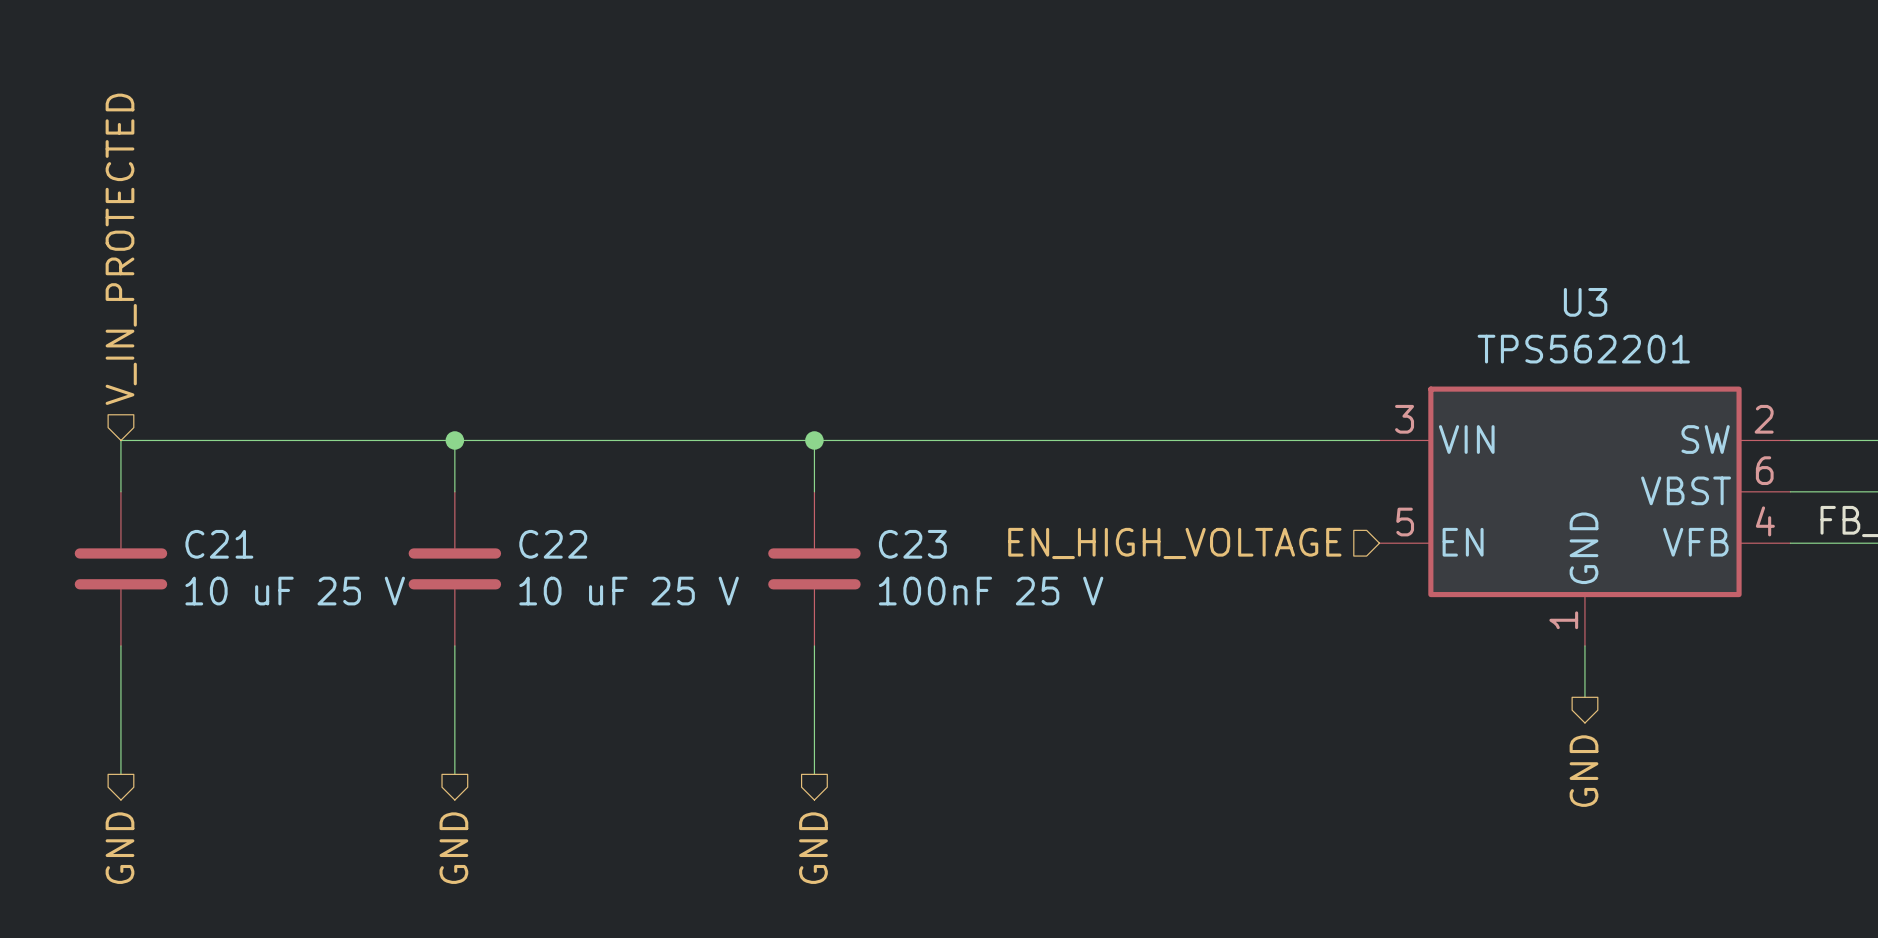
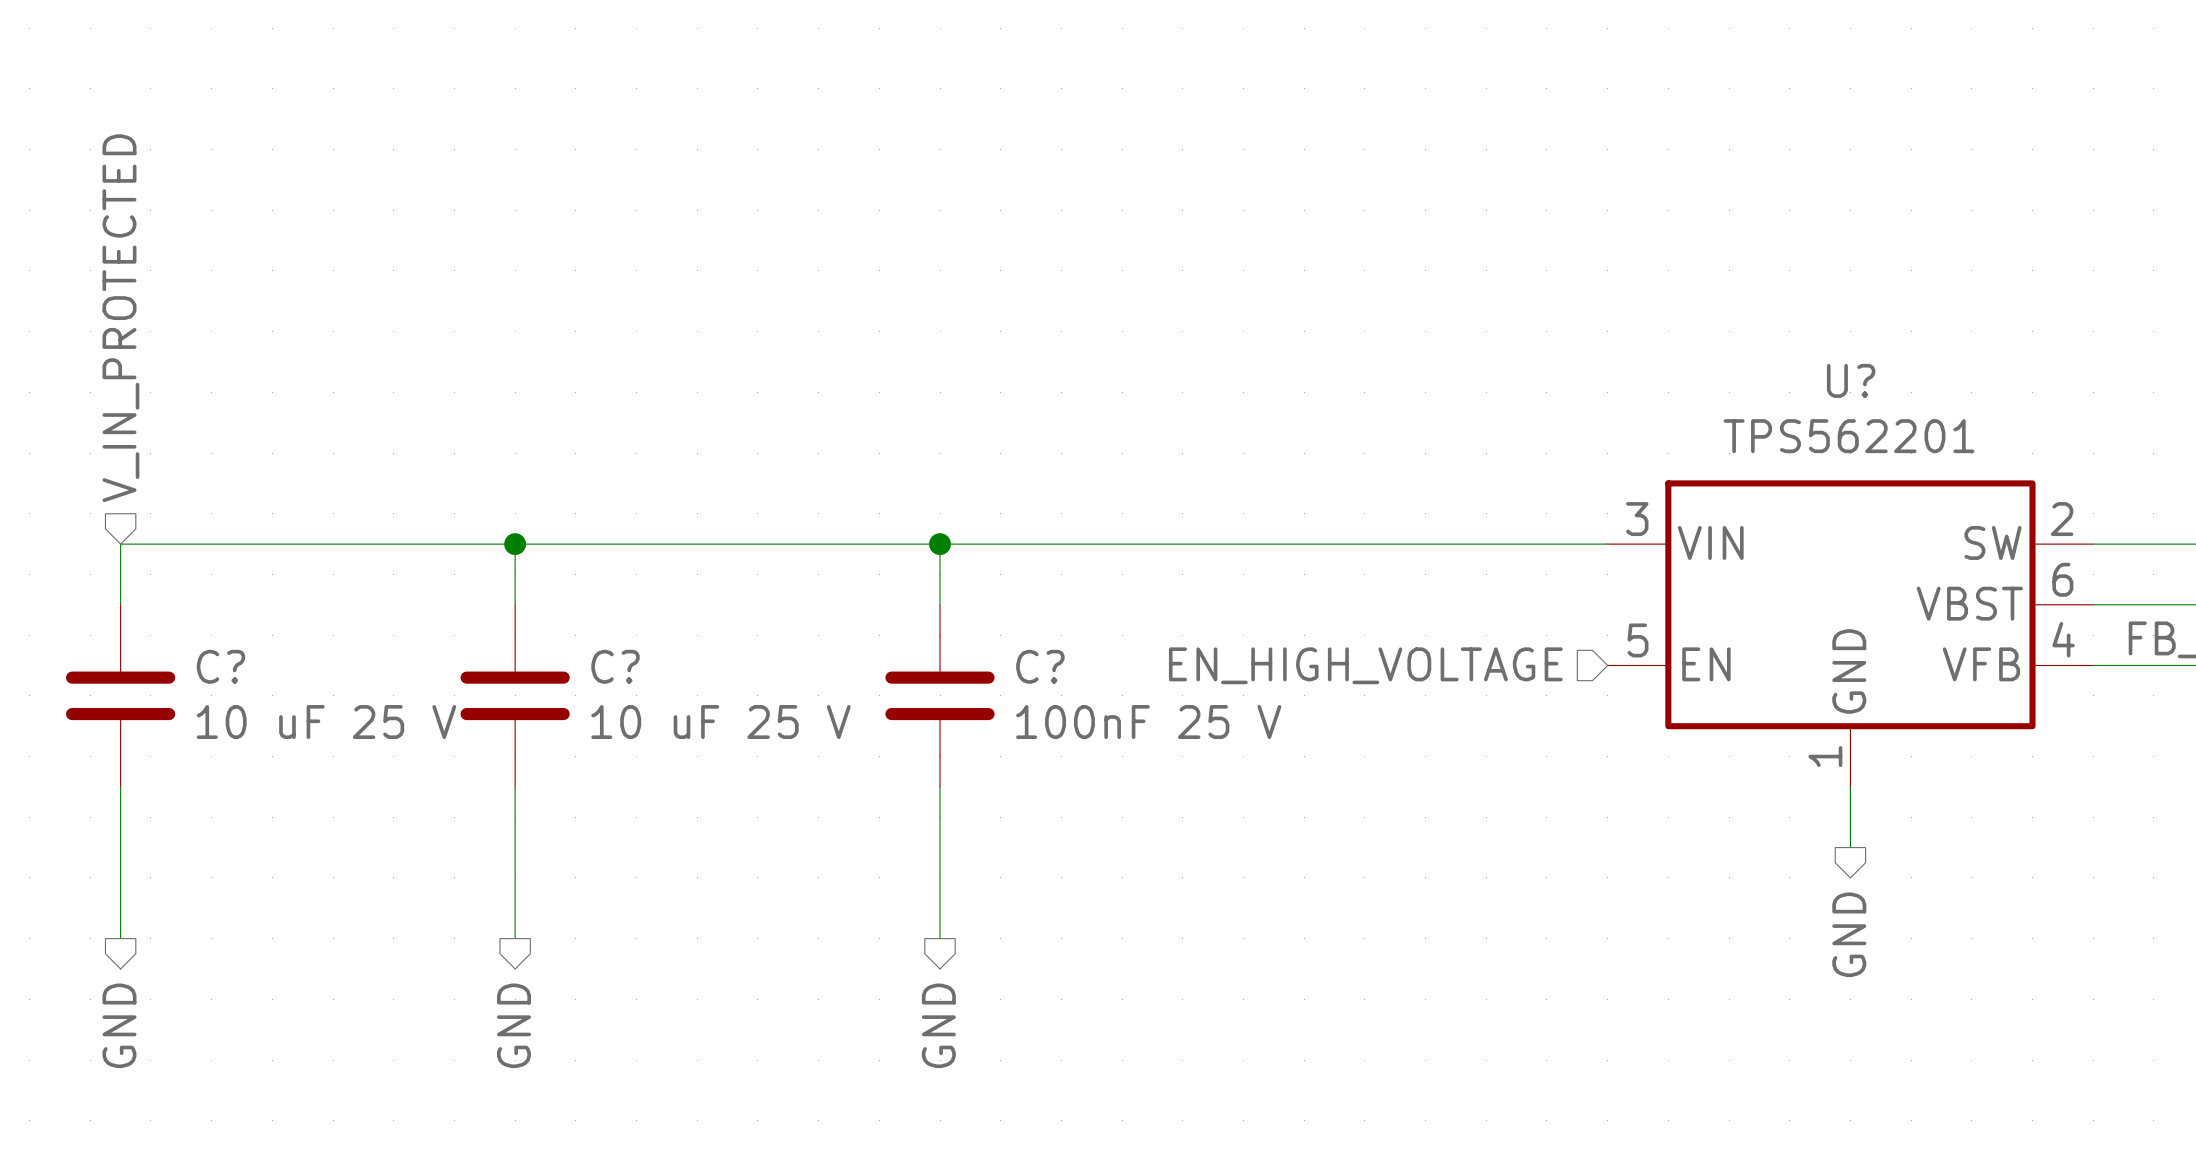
U3 name: U3 (1585, 302) -> U? (1851, 380)
C21 name: C21 (219, 544) -> C? (220, 666)
C22 name: C22 (553, 544) -> C? (615, 666)
C23 name: C23 (912, 544) -> C? (1040, 666)

